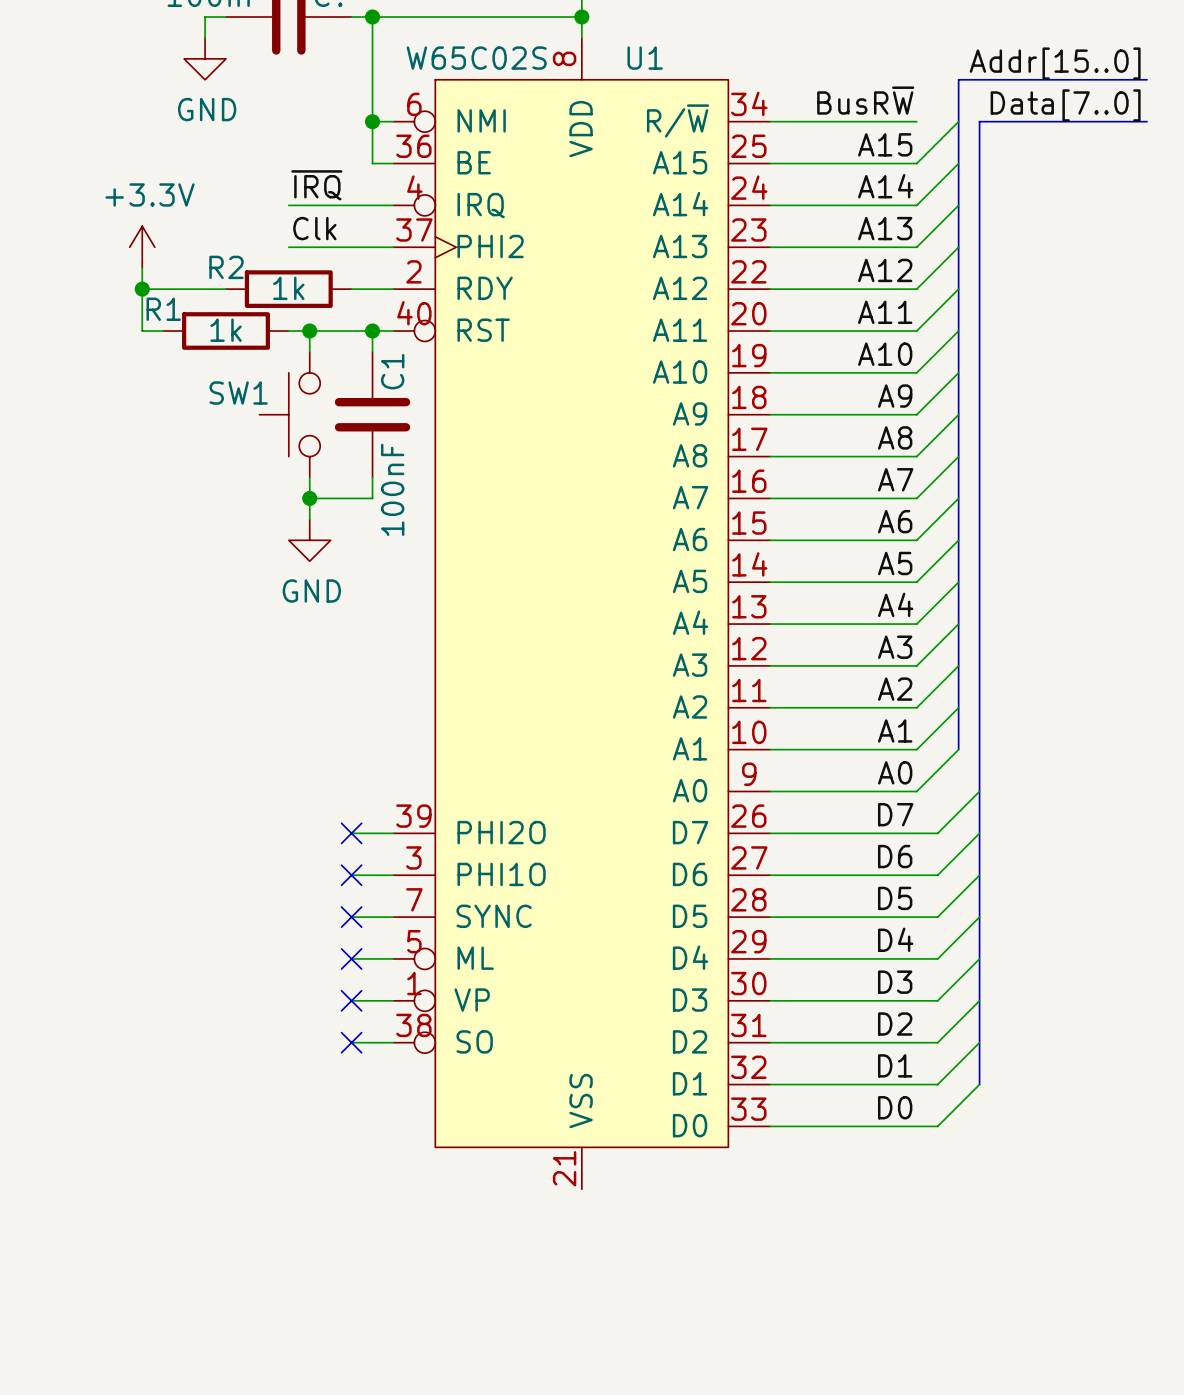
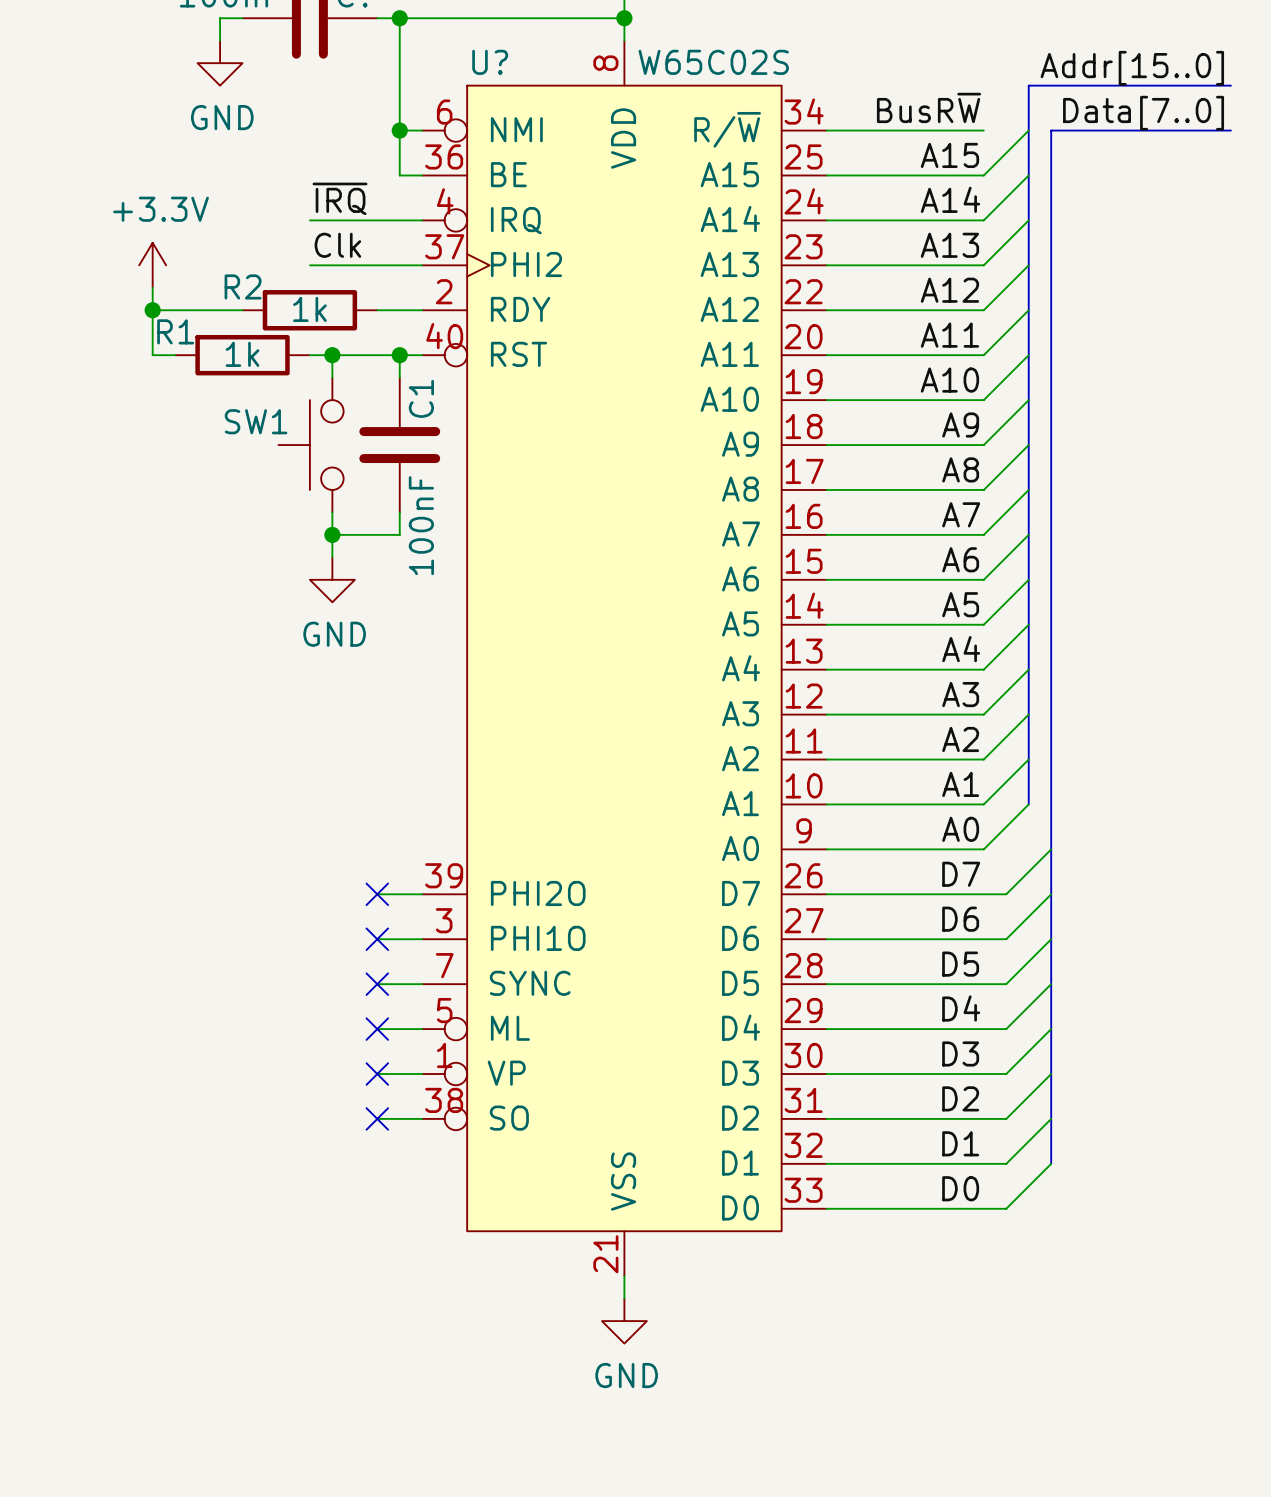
U1 value position: W65C02S (476, 58) -> W65C02S (713, 62)
U1 name: U1 (645, 58) -> U? (490, 62)
wire: none -> (624, 1276) (624, 1298)
power symbol: none -> GND (624, 1321)

